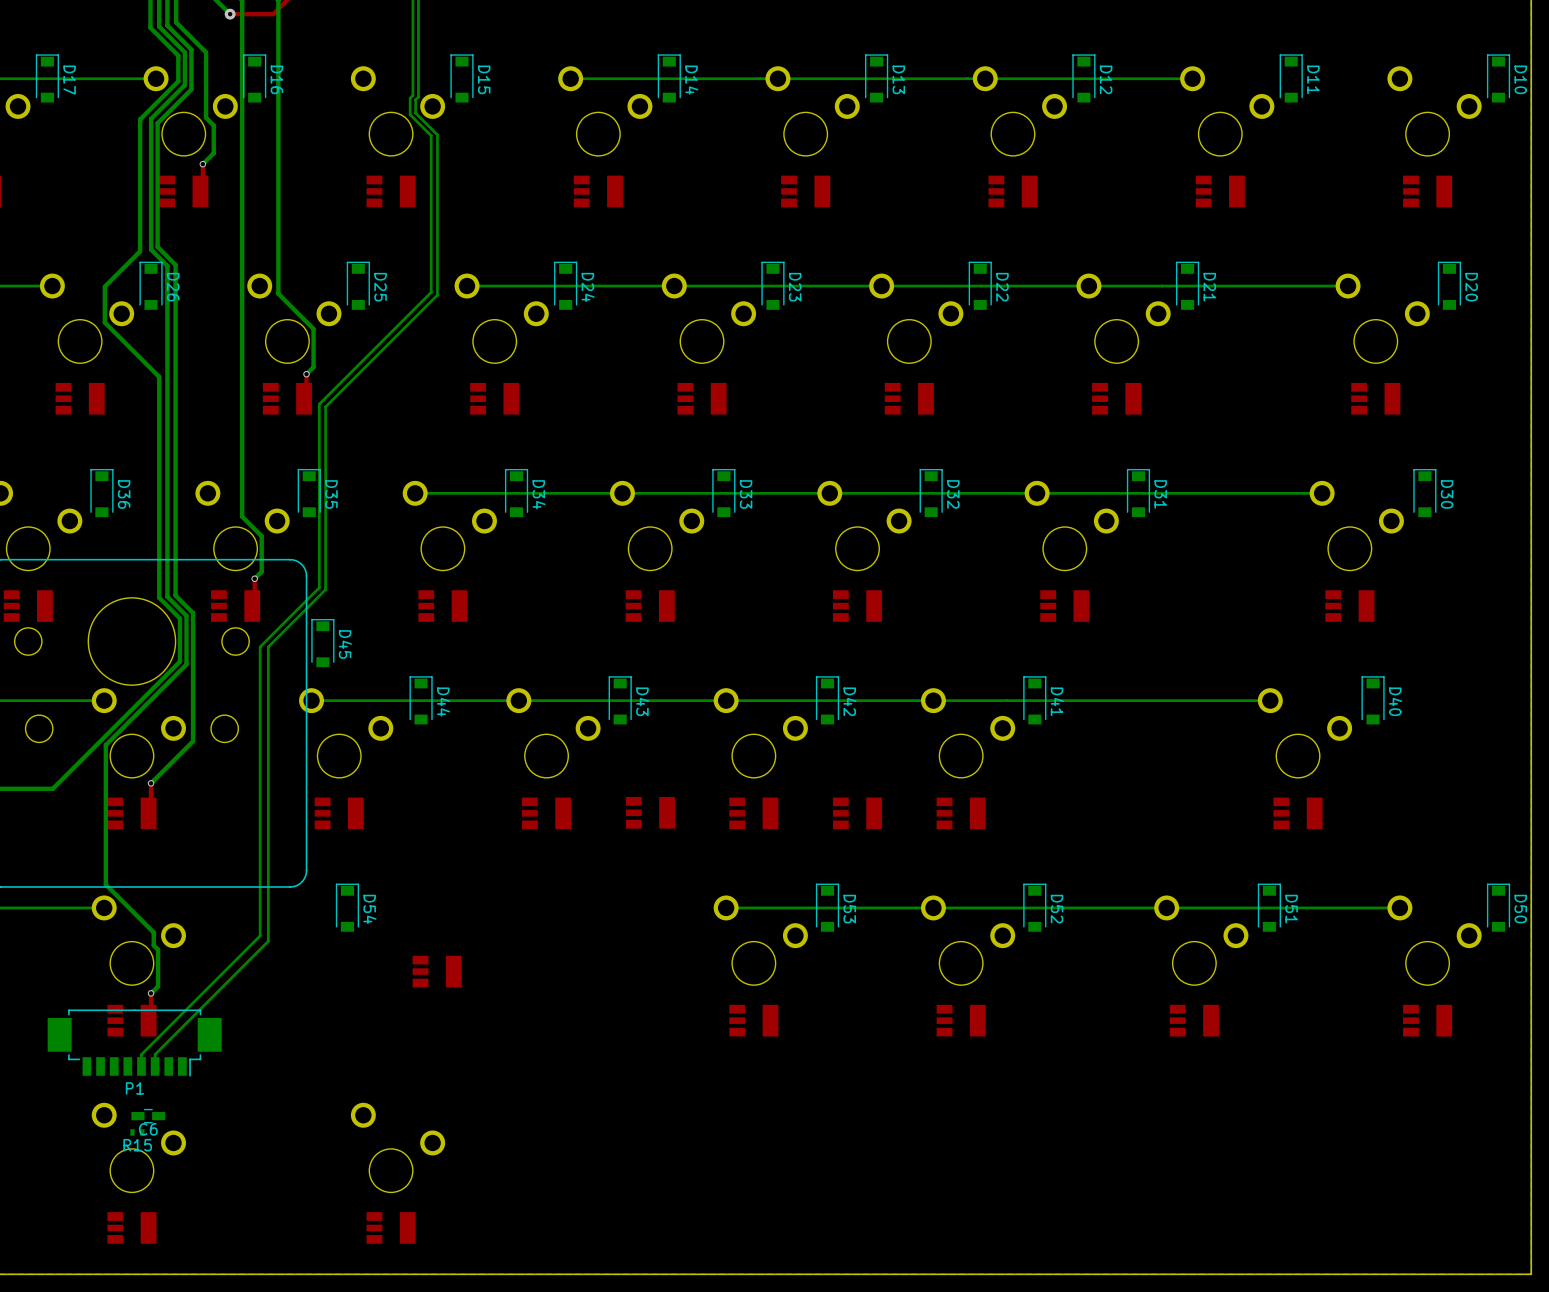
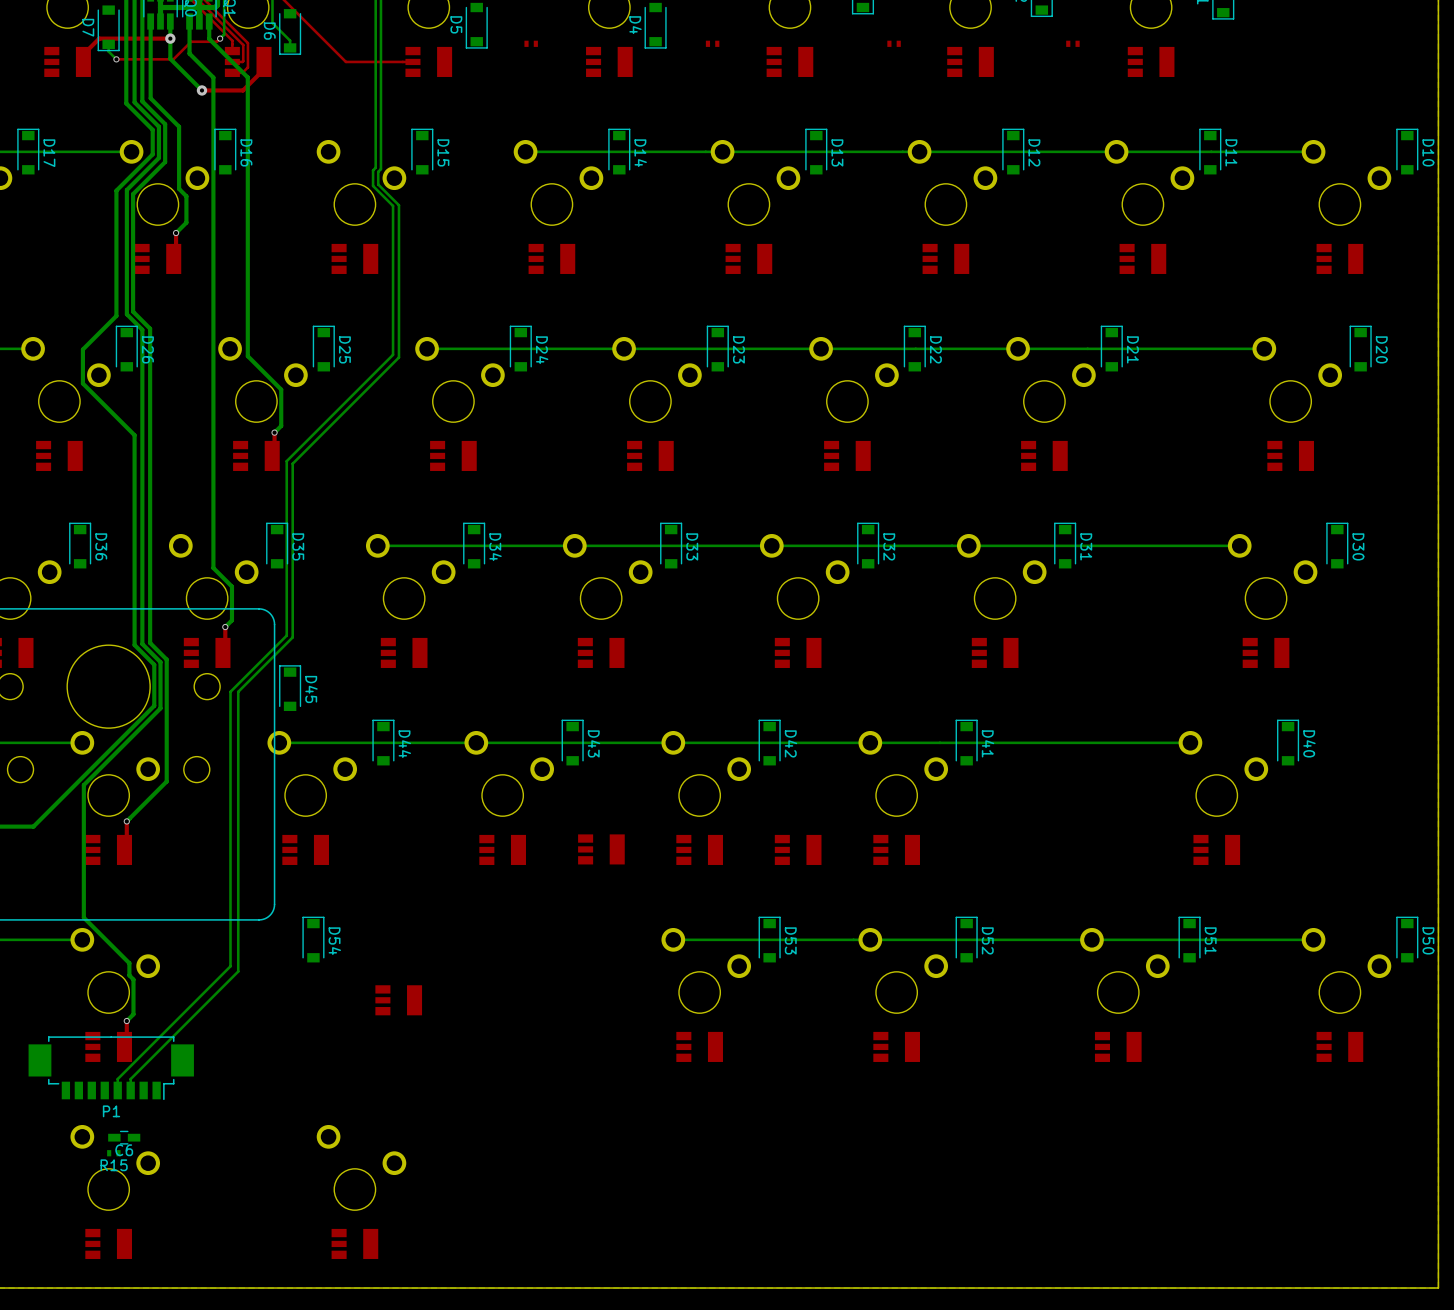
bottom track: none -> (1313, 151) (1116, 151)

